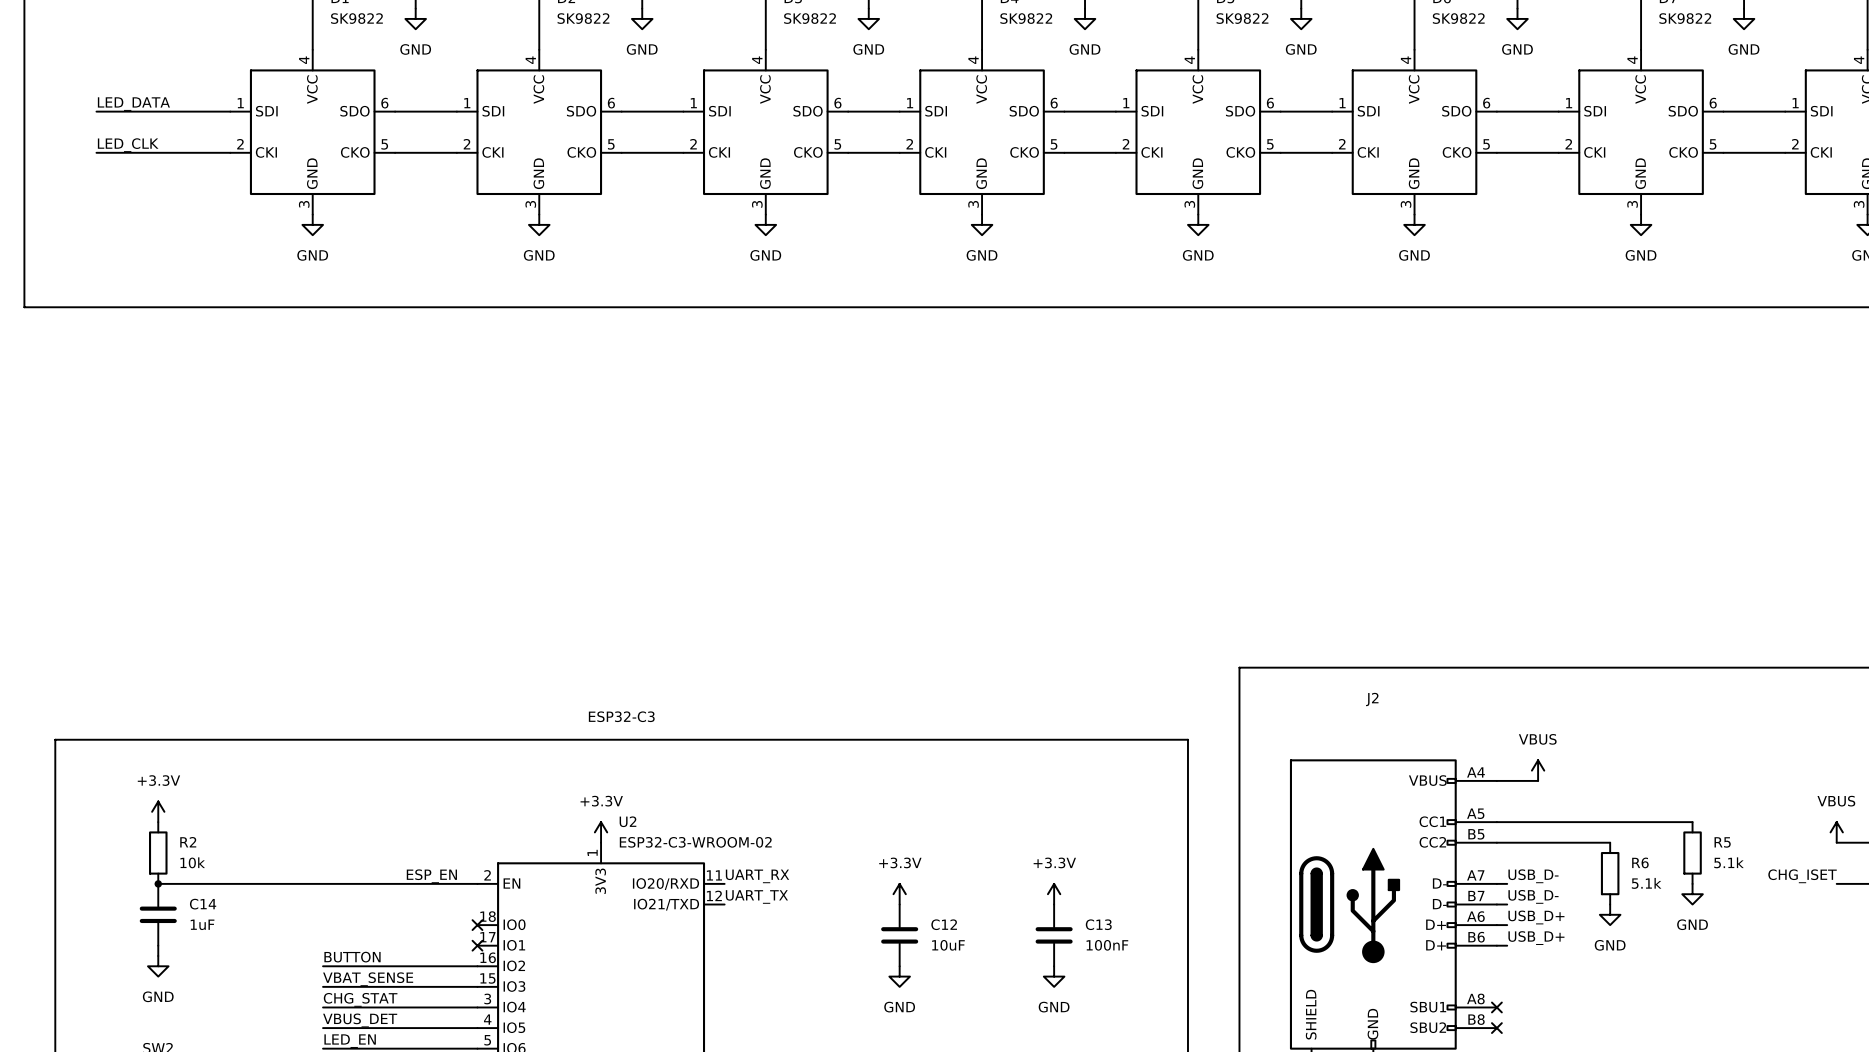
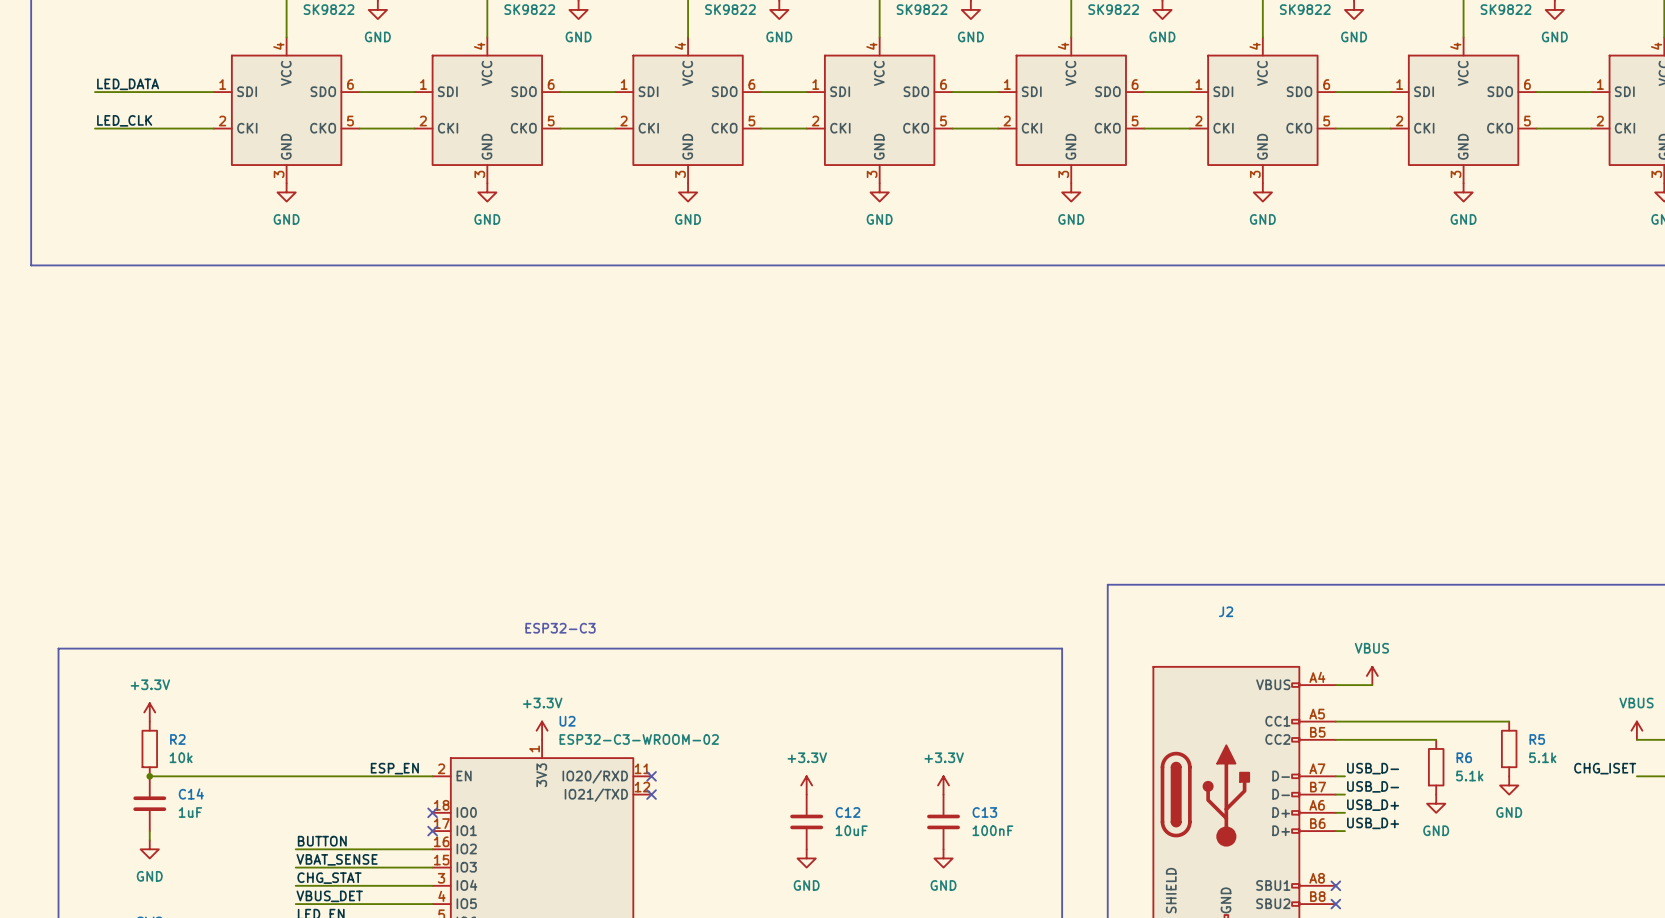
label: UART_RX (757, 876) -> none
no-connect mark: none -> (651, 776)
label: UART_TX (756, 896) -> none
no-connect mark: none -> (651, 794)

